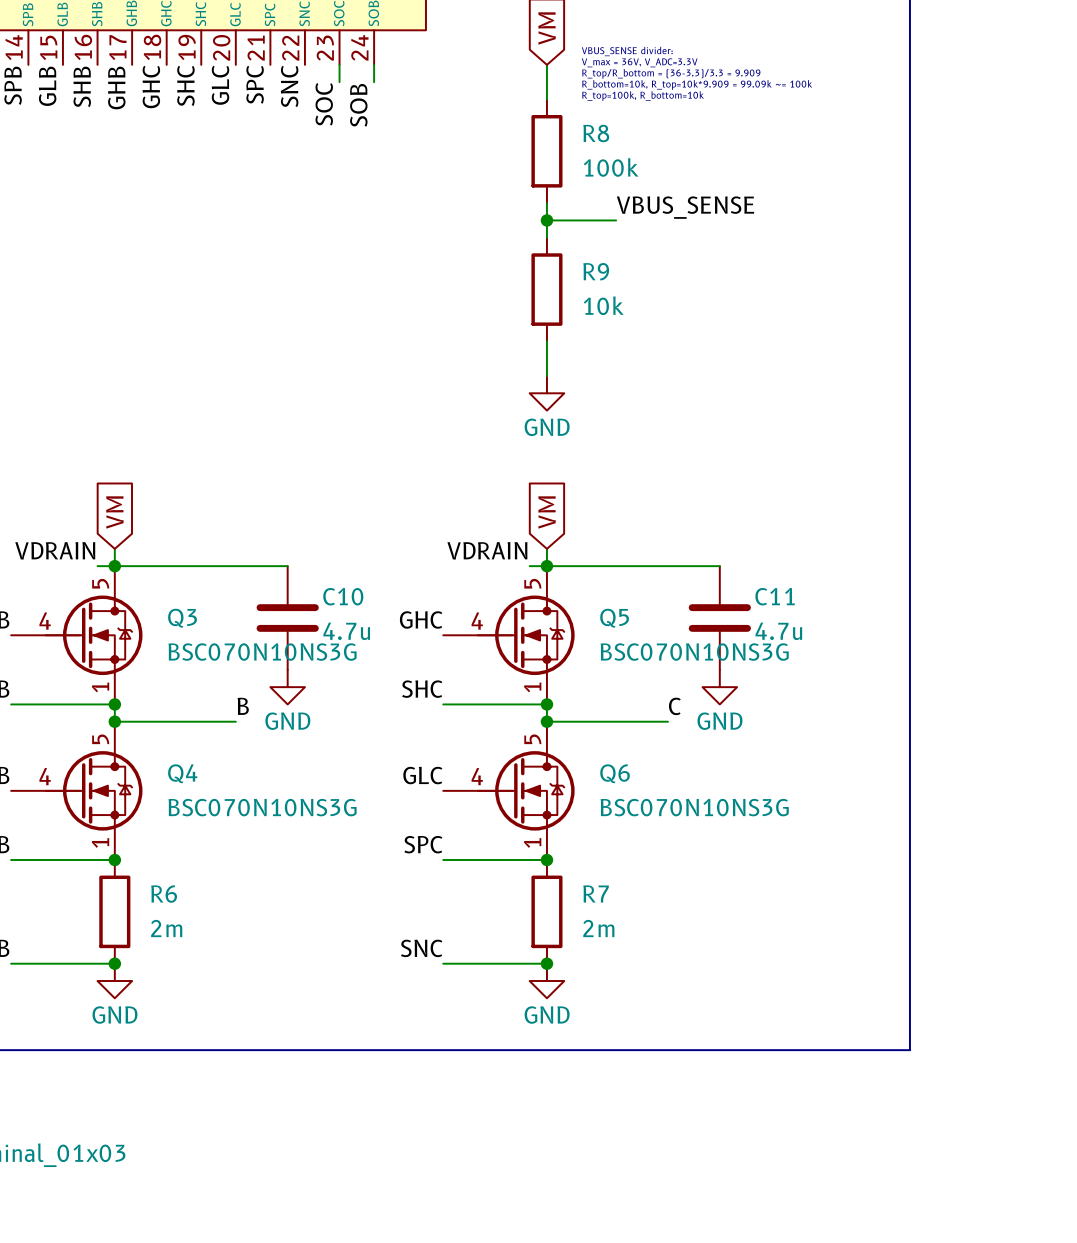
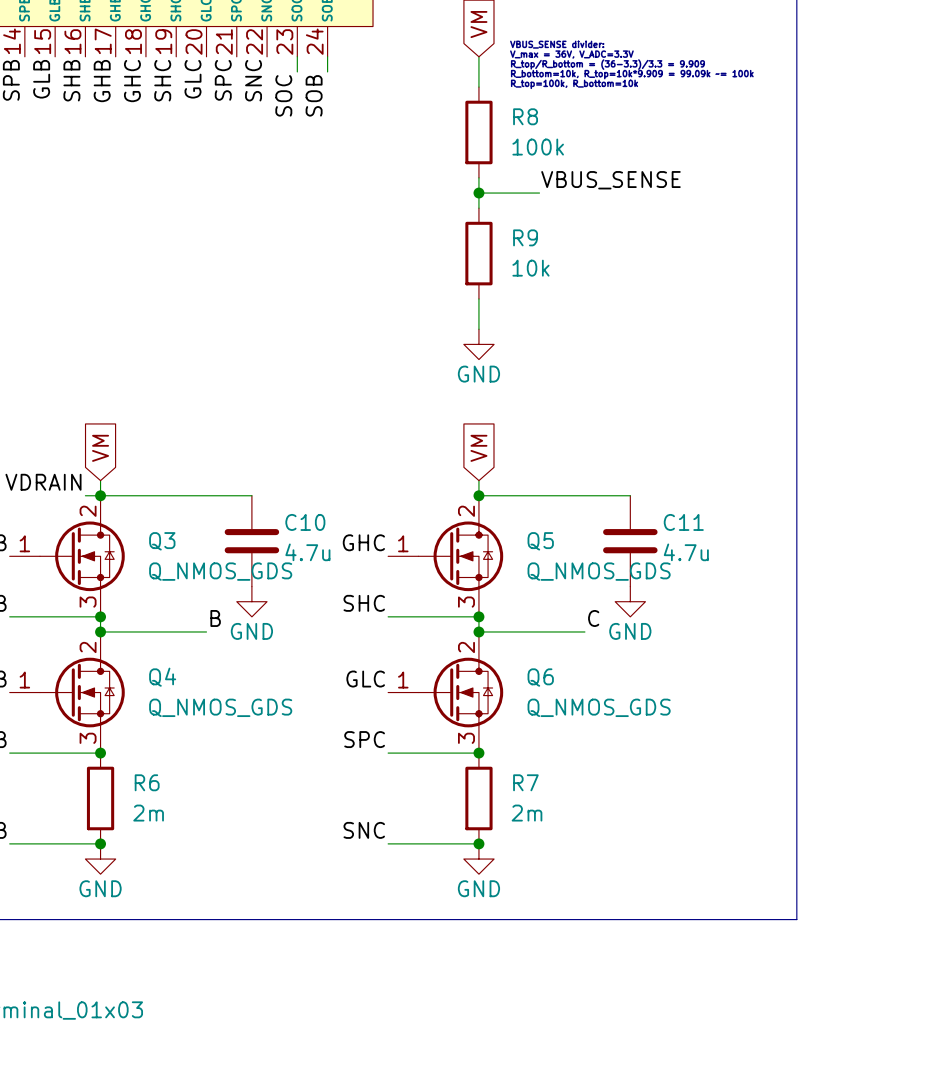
label: VDRAIN (487, 550) -> none
Q3 symbol: [11, 566, 143, 705] -> [9, 495, 125, 617]
Q5 symbol: [443, 566, 575, 705] -> [388, 495, 504, 617]
wire: (529, 566) (546, 566) -> none
Q3 value: BSC070N10NS3G (262, 652) -> Q_NMOS_GDS (220, 571)
Q5 value: BSC070N10NS3G (694, 652) -> Q_NMOS_GDS (599, 571)
Q4 symbol: [11, 721, 143, 861] -> [9, 631, 125, 754]
Q6 symbol: [443, 721, 575, 861] -> [388, 631, 504, 754]
Q4 value: BSC070N10NS3G (262, 807) -> Q_NMOS_GDS (220, 707)
Q6 value: BSC070N10NS3G (694, 807) -> Q_NMOS_GDS (599, 707)

